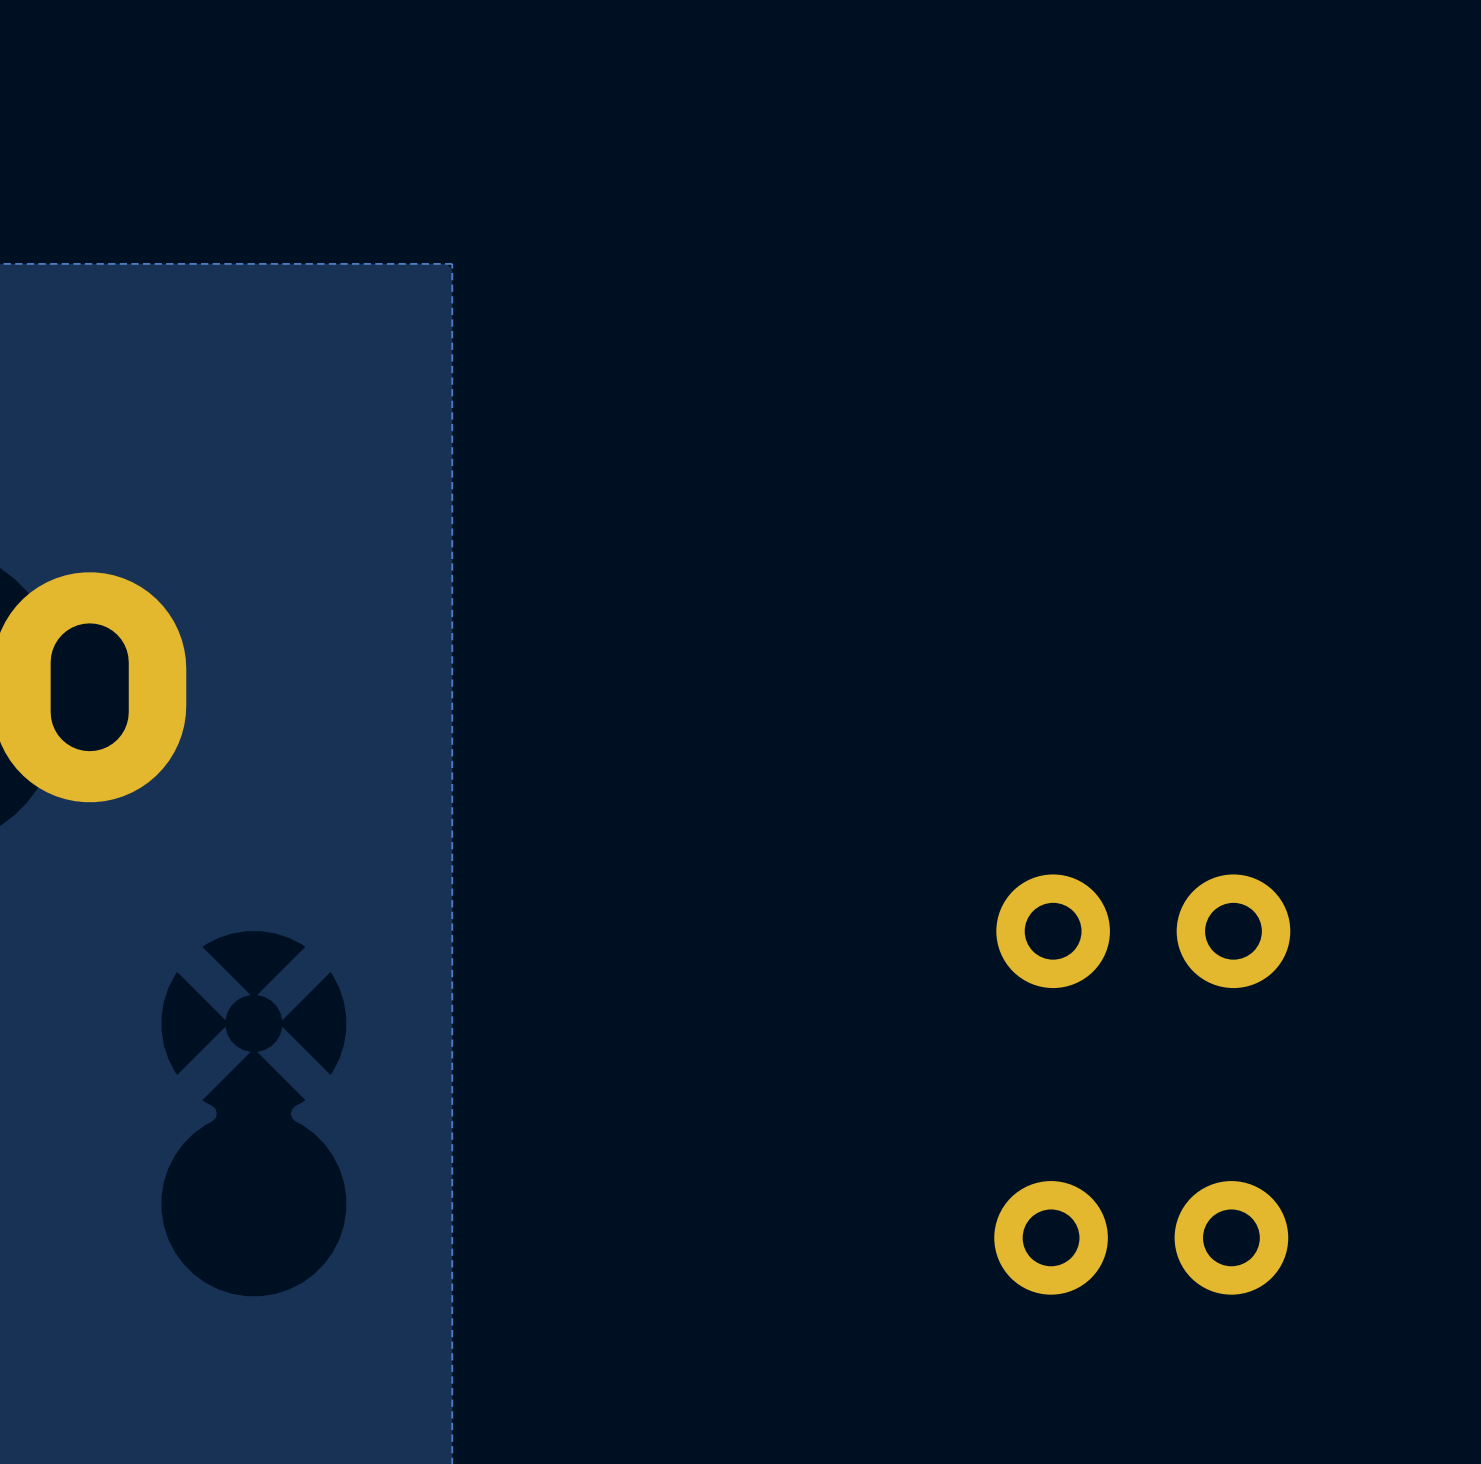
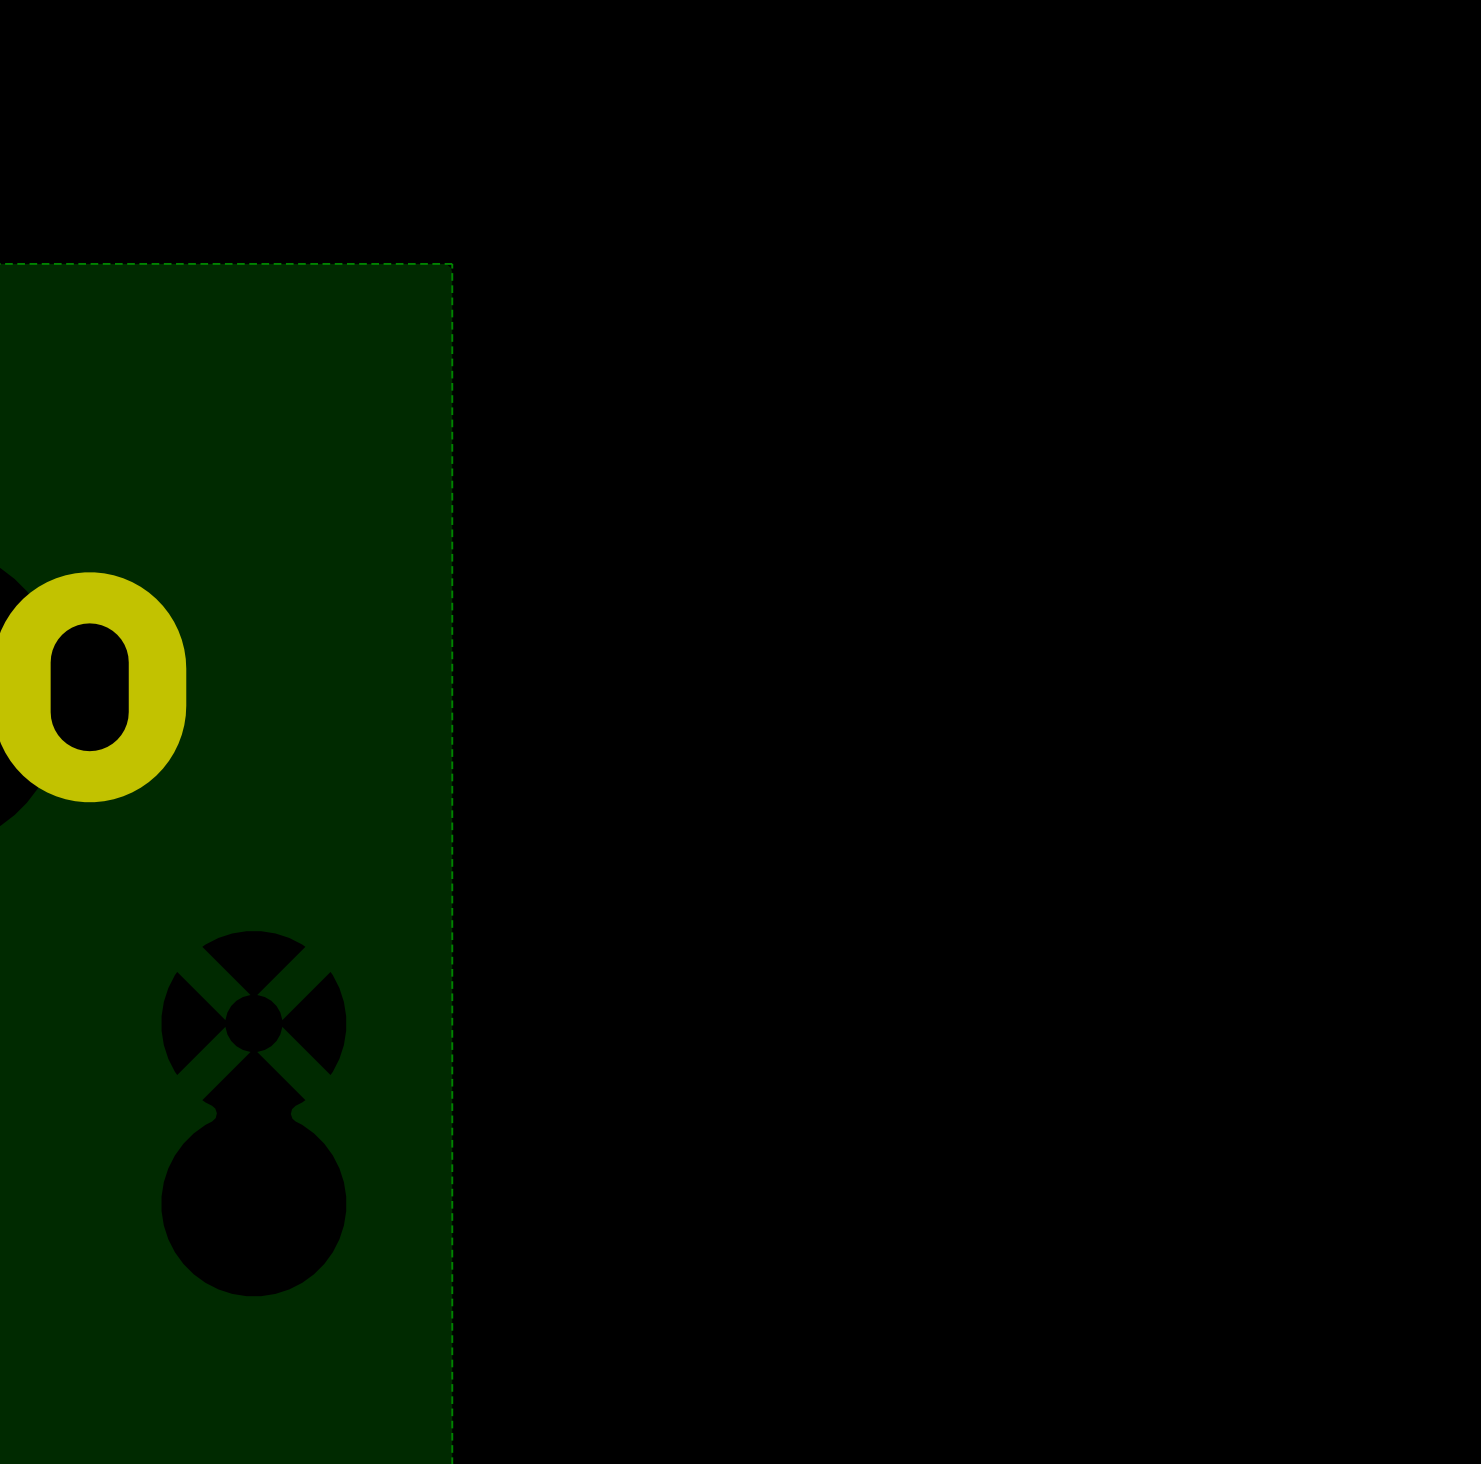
part: (1143, 931) -> none
part: (1141, 1237) -> none

